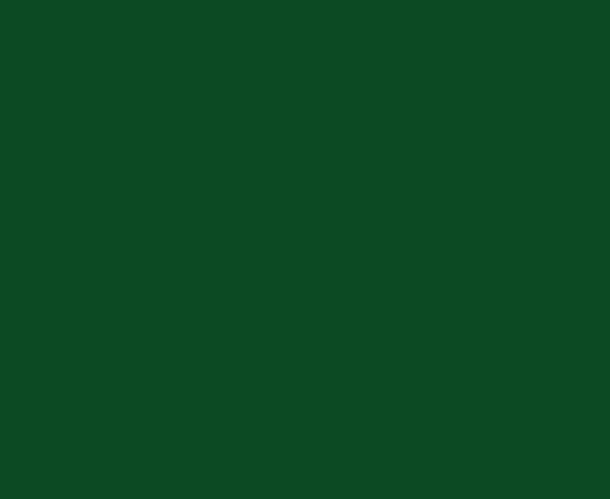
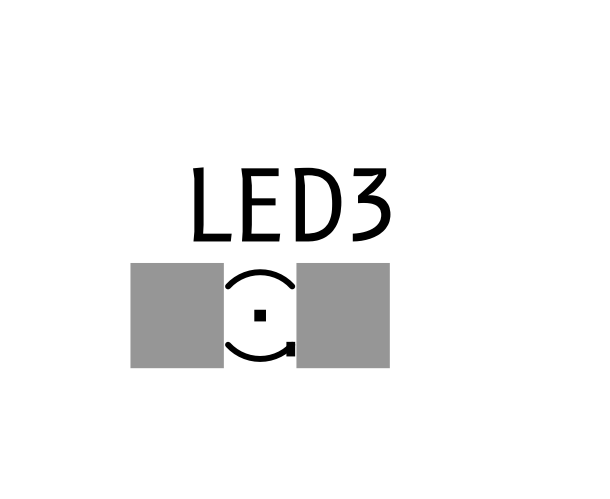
LED3: none -> (260, 315)

